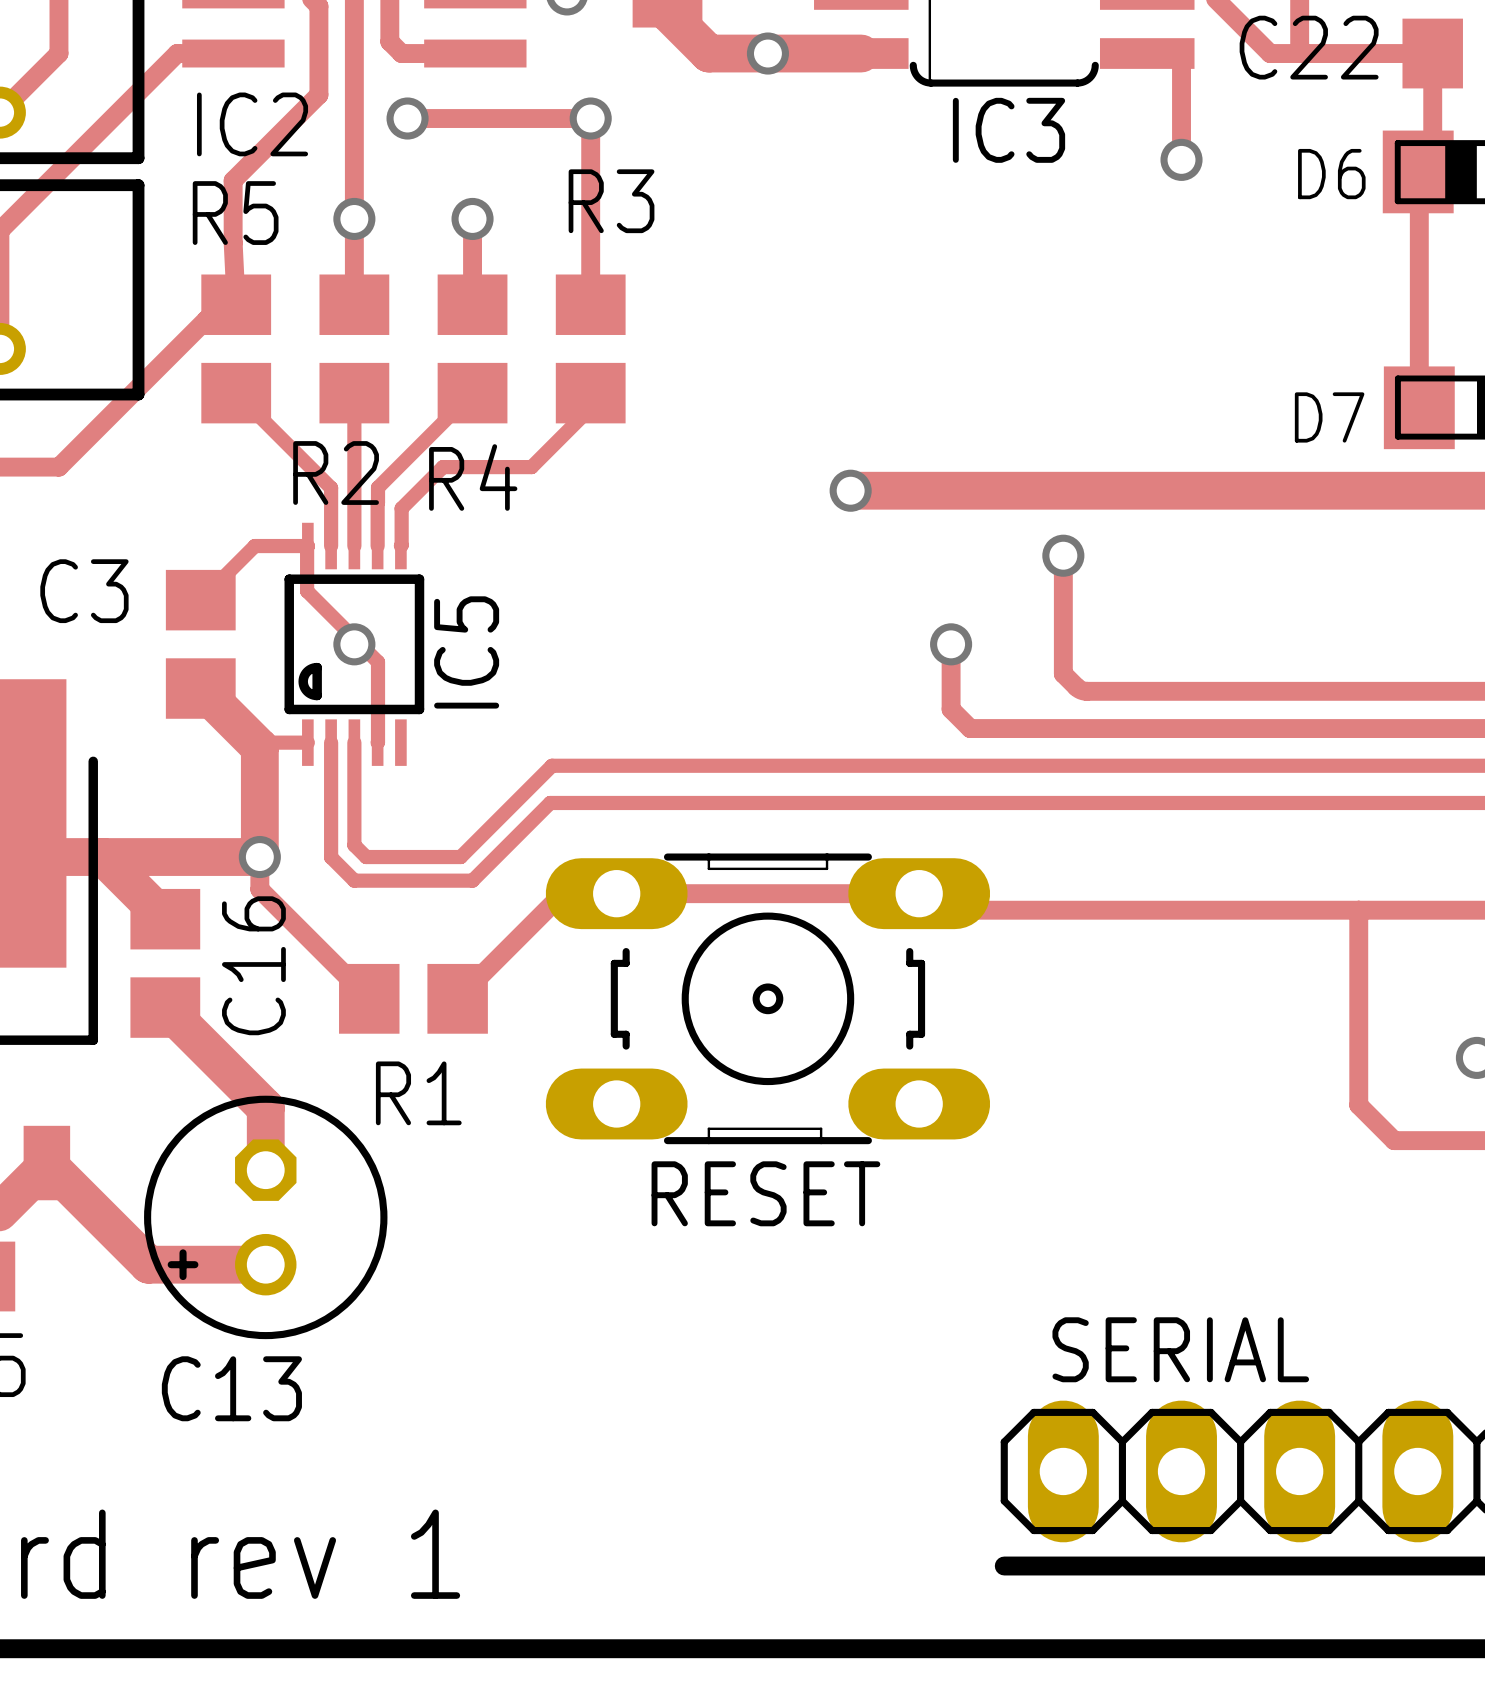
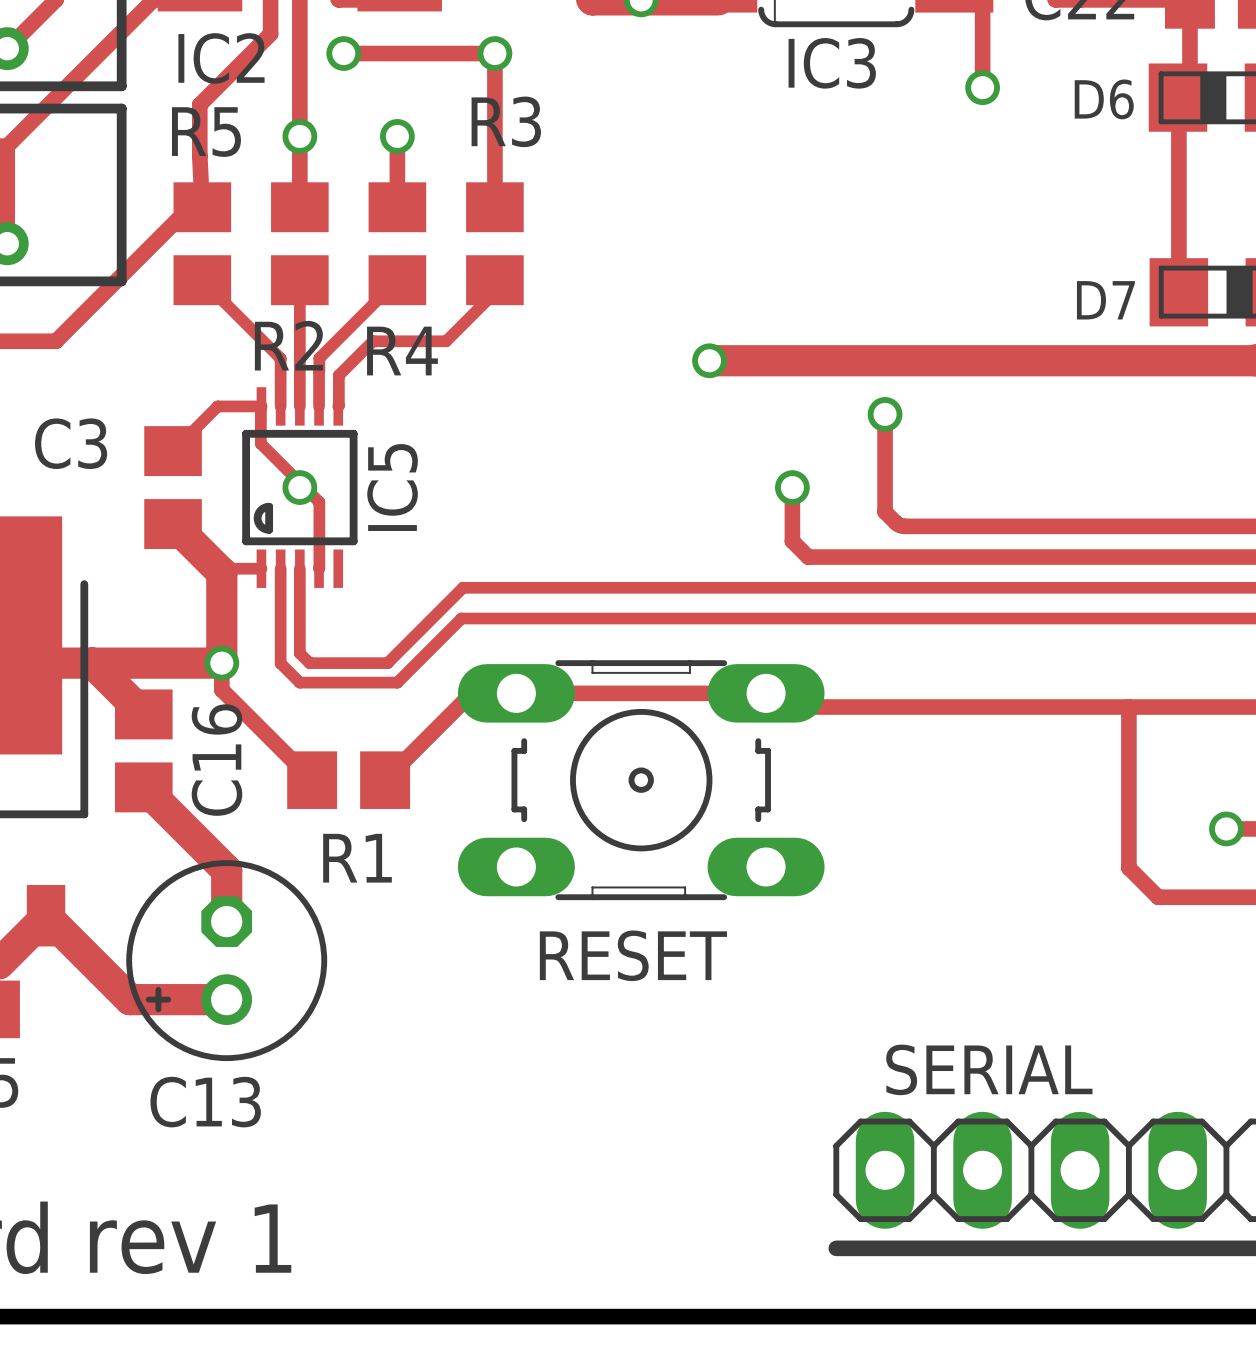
RESET name position: RESET (765, 1193) -> RESET (633, 955)

